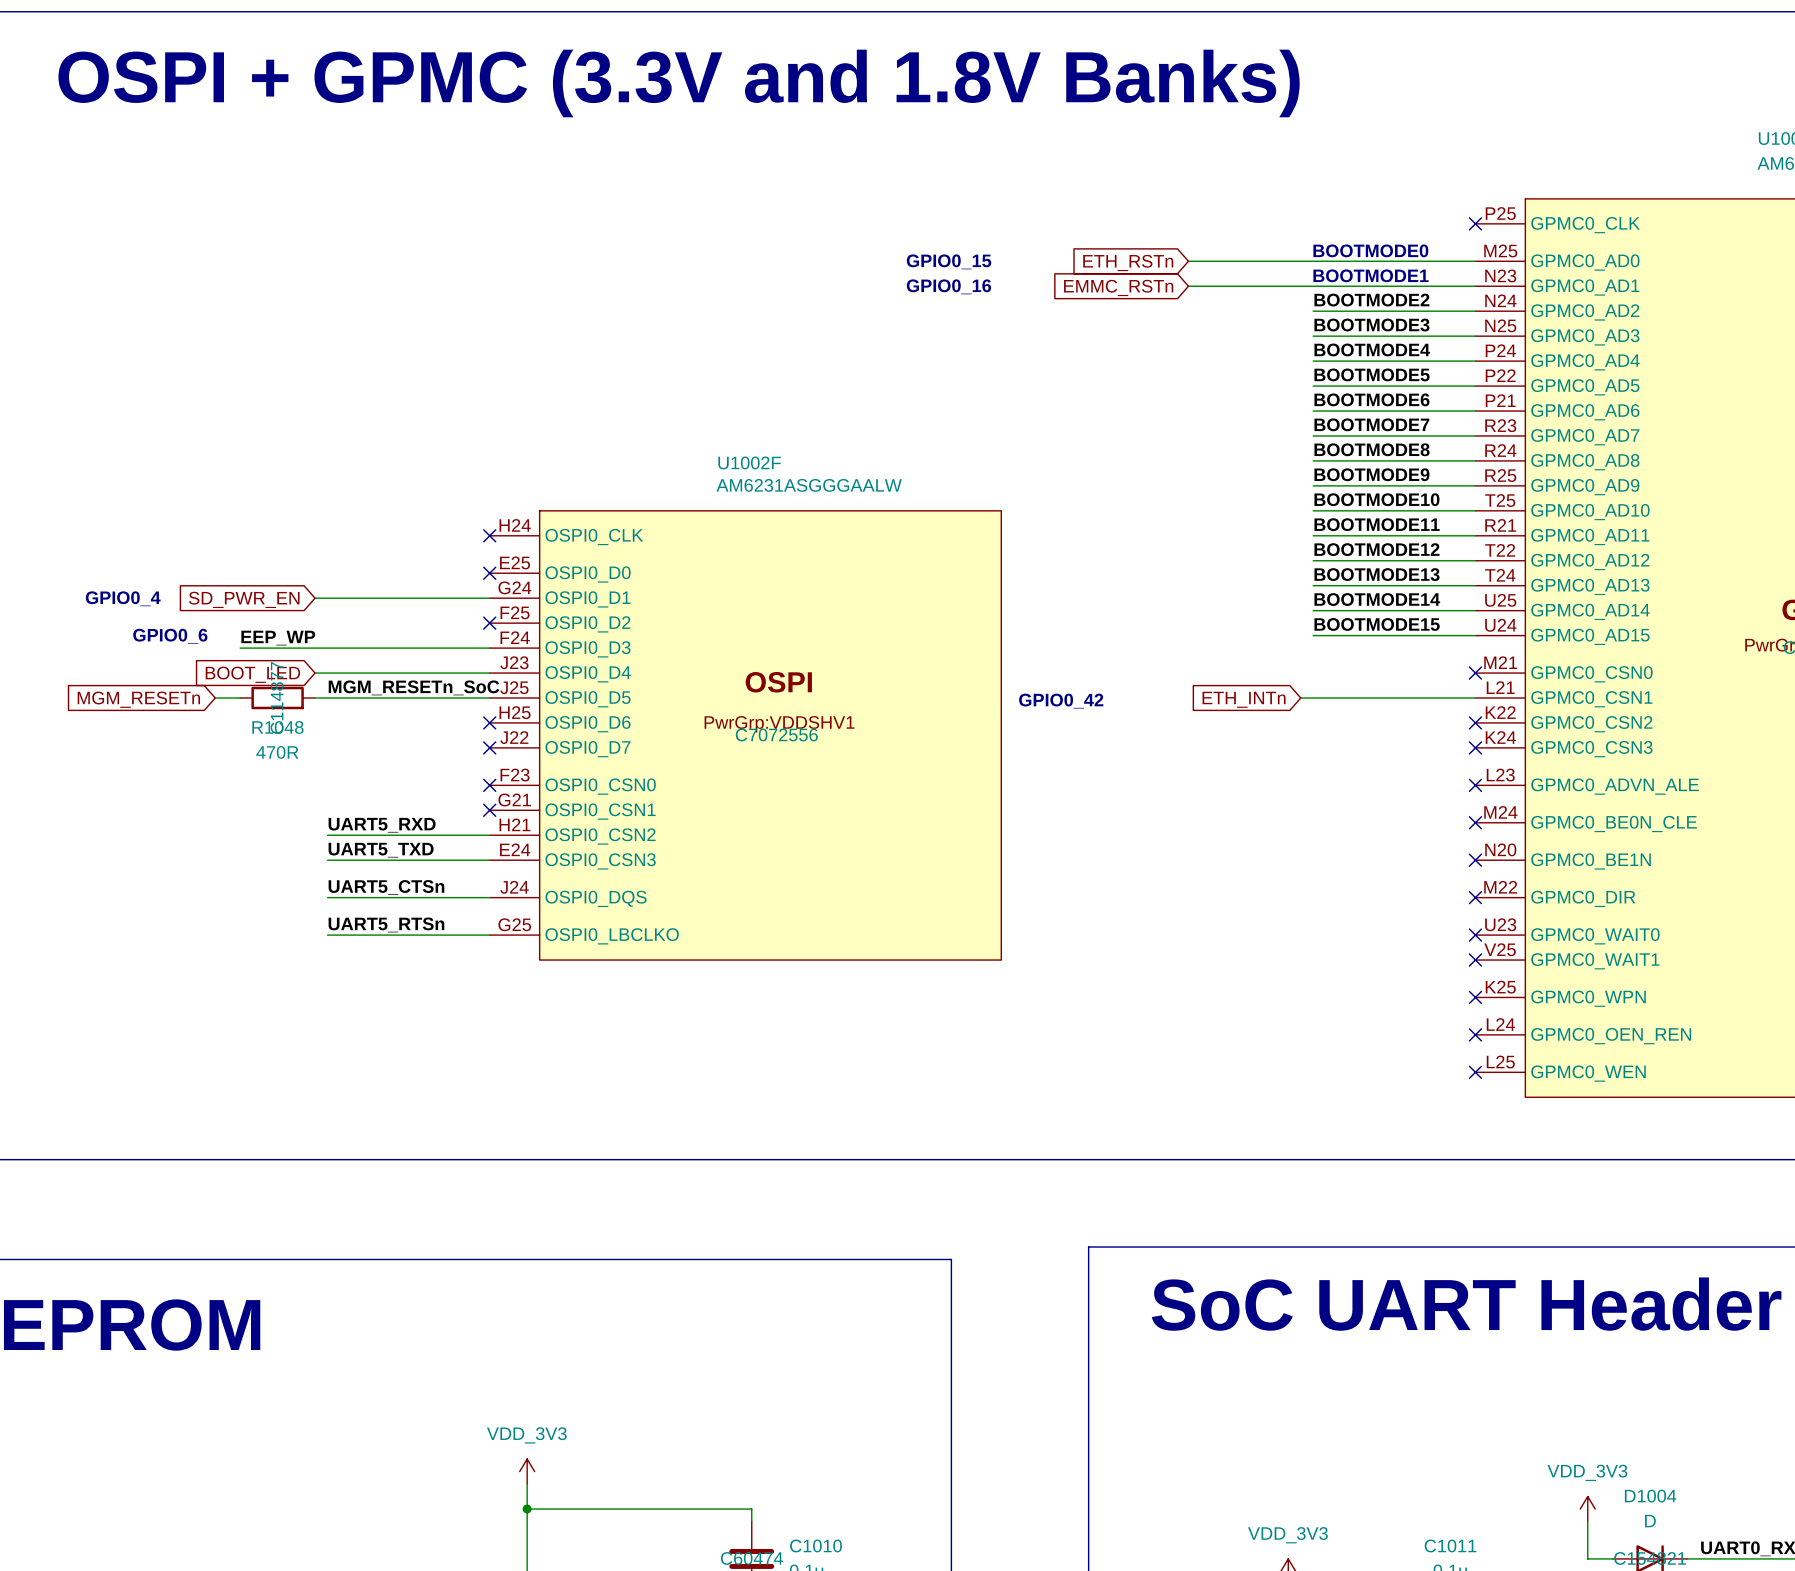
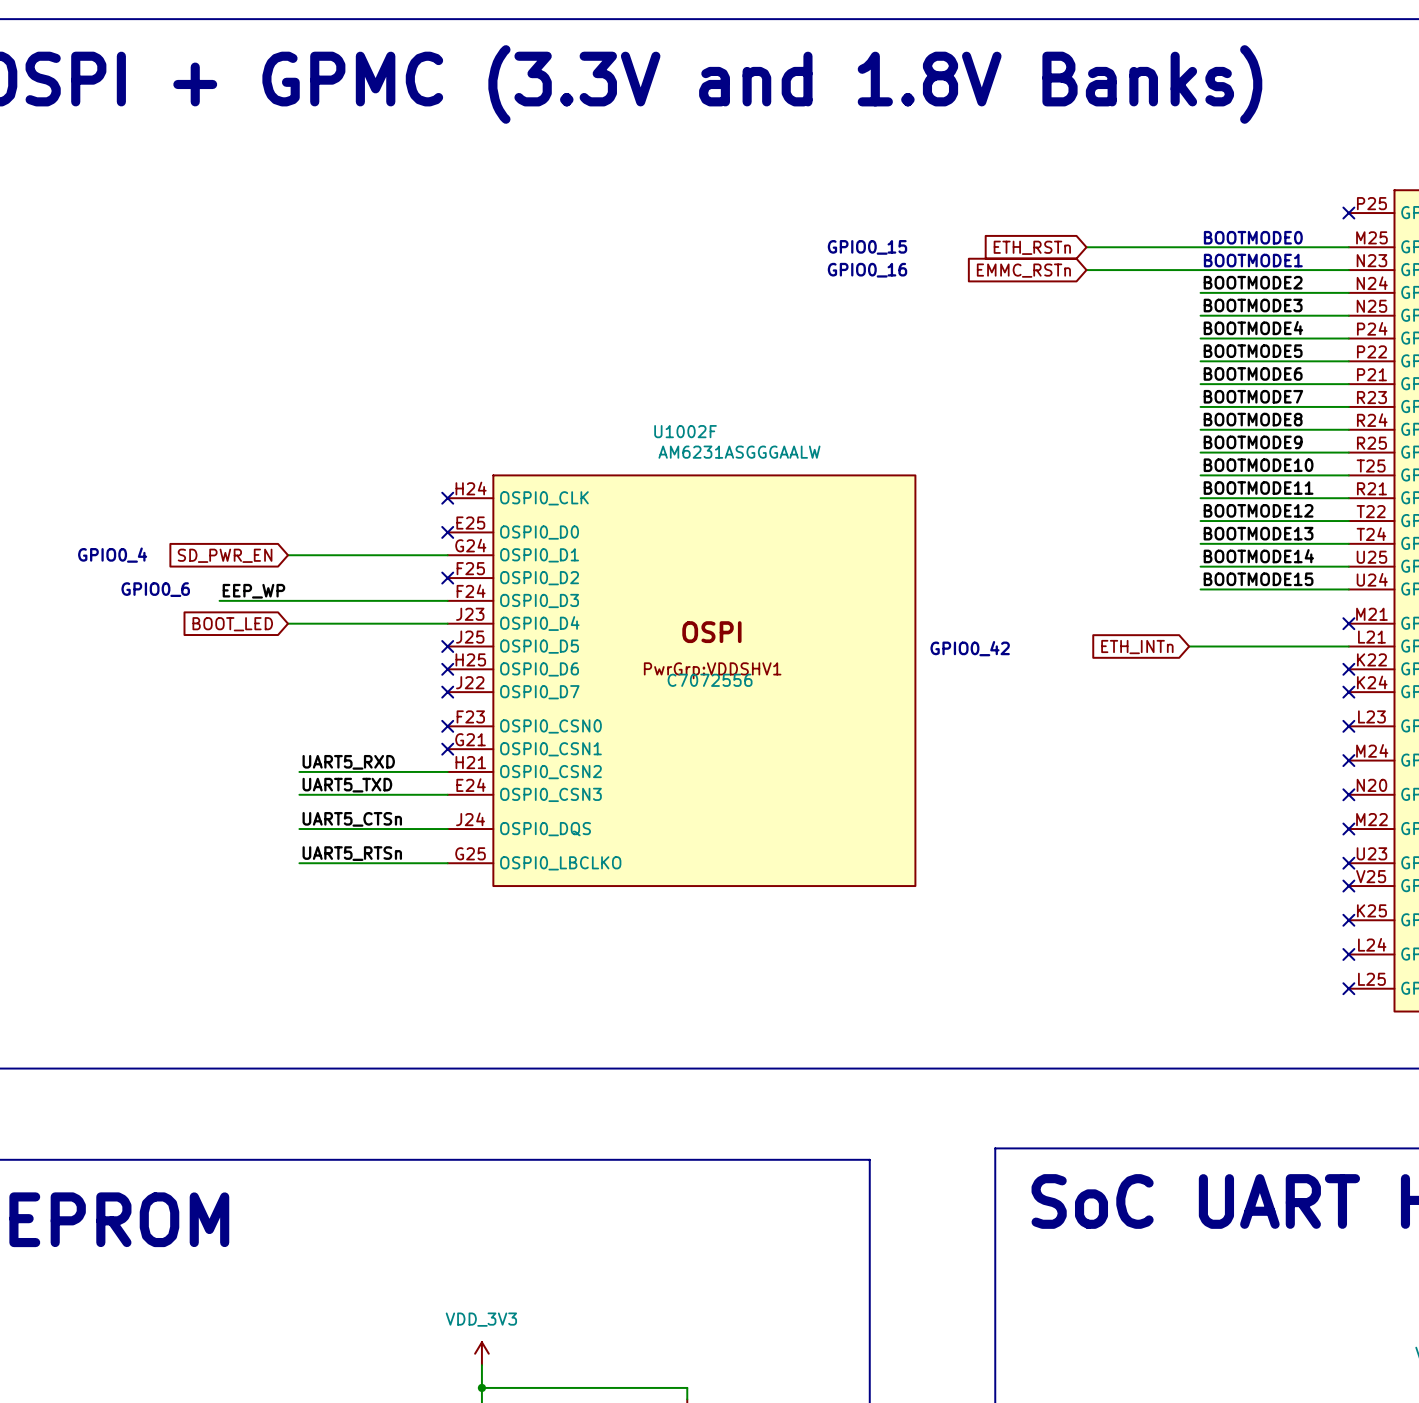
label: MGM_RESETn_SoC (414, 687) -> none
wire: (215, 698) (240, 698) -> none
R1048: 470R (277, 698) -> none
wire: (315, 698) (489, 698) -> none
no-connect mark: none -> (447, 646)
global label: MGM_RESETn (138, 699) -> none

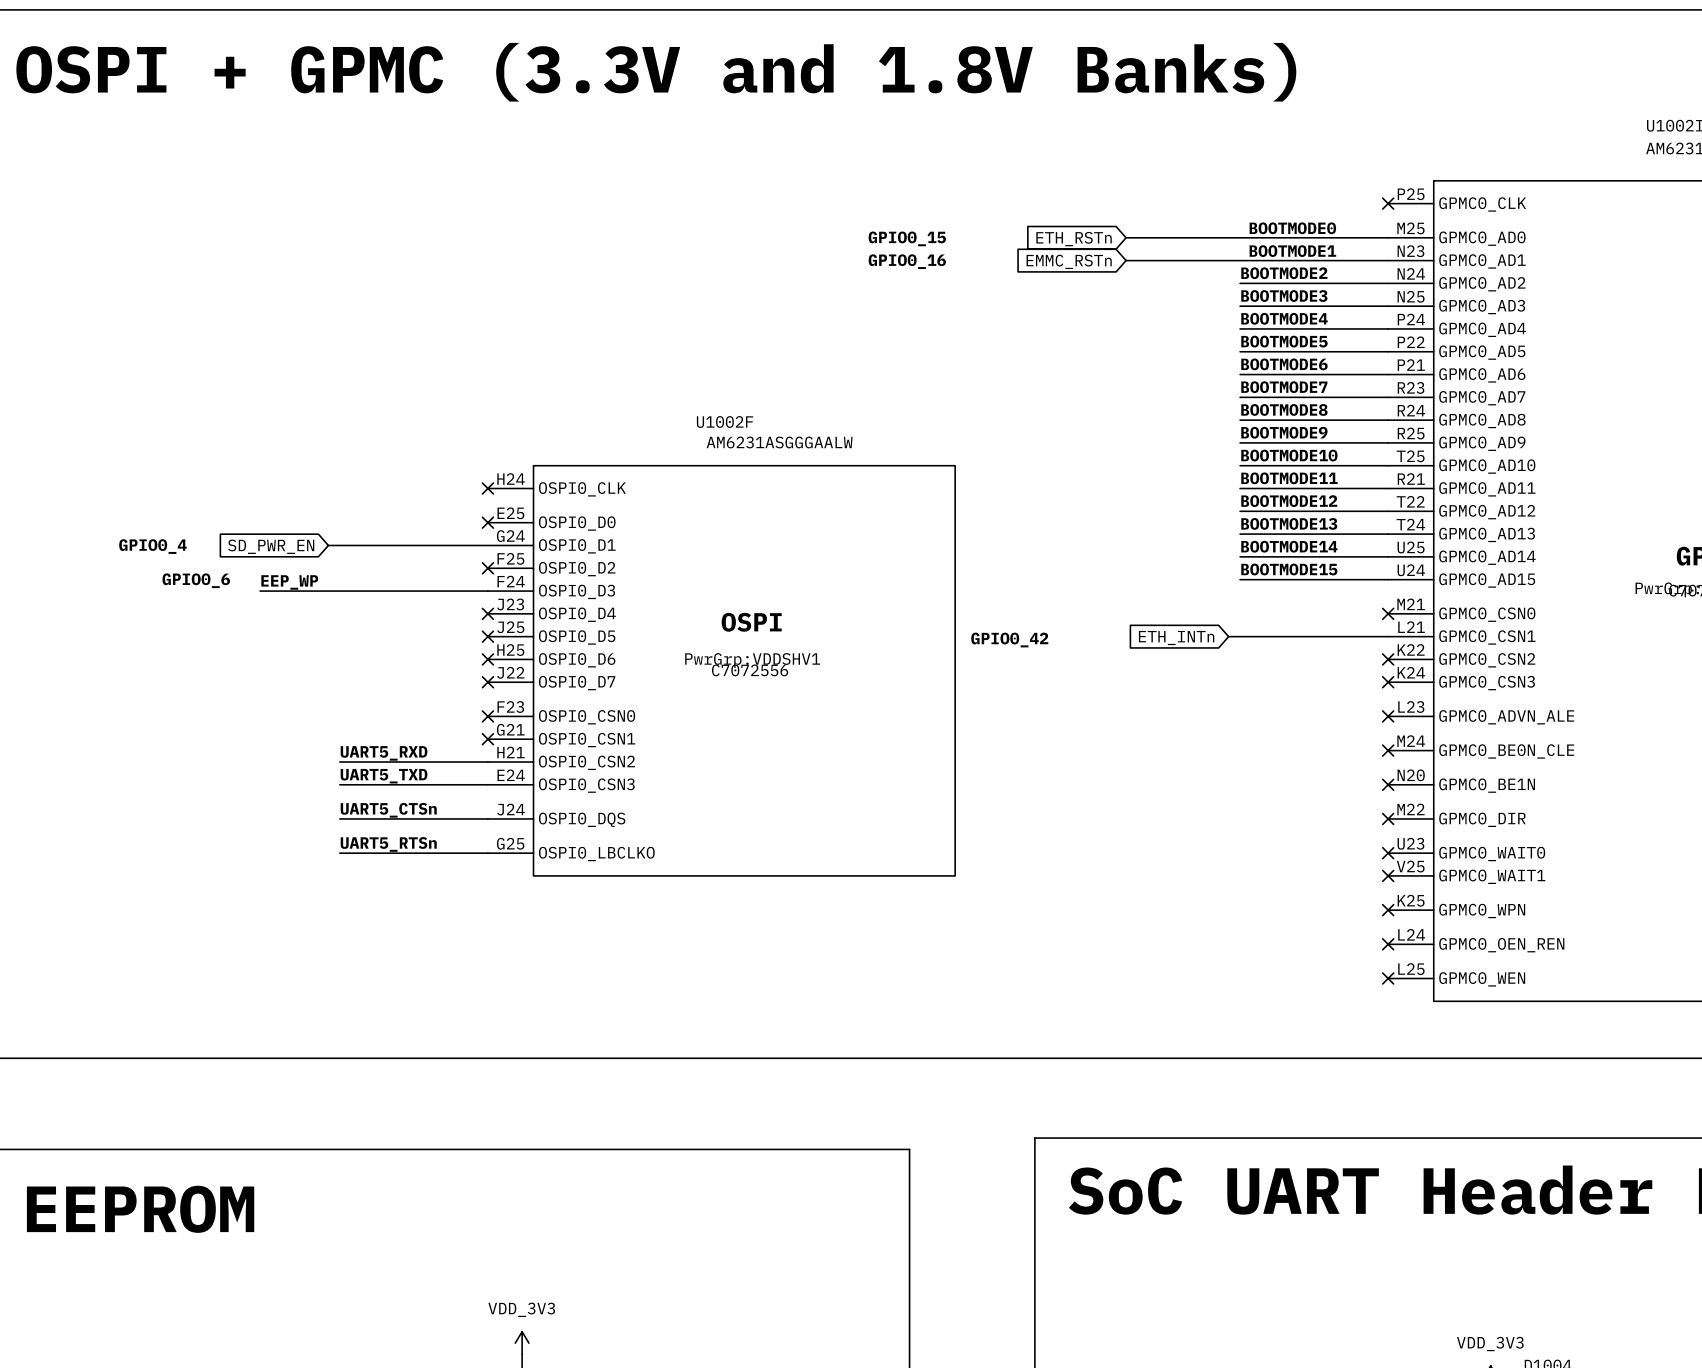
wire: (288, 623) (447, 623) -> none
no-connect mark: none -> (487, 613)
global label: BOOT_LED (232, 624) -> none

